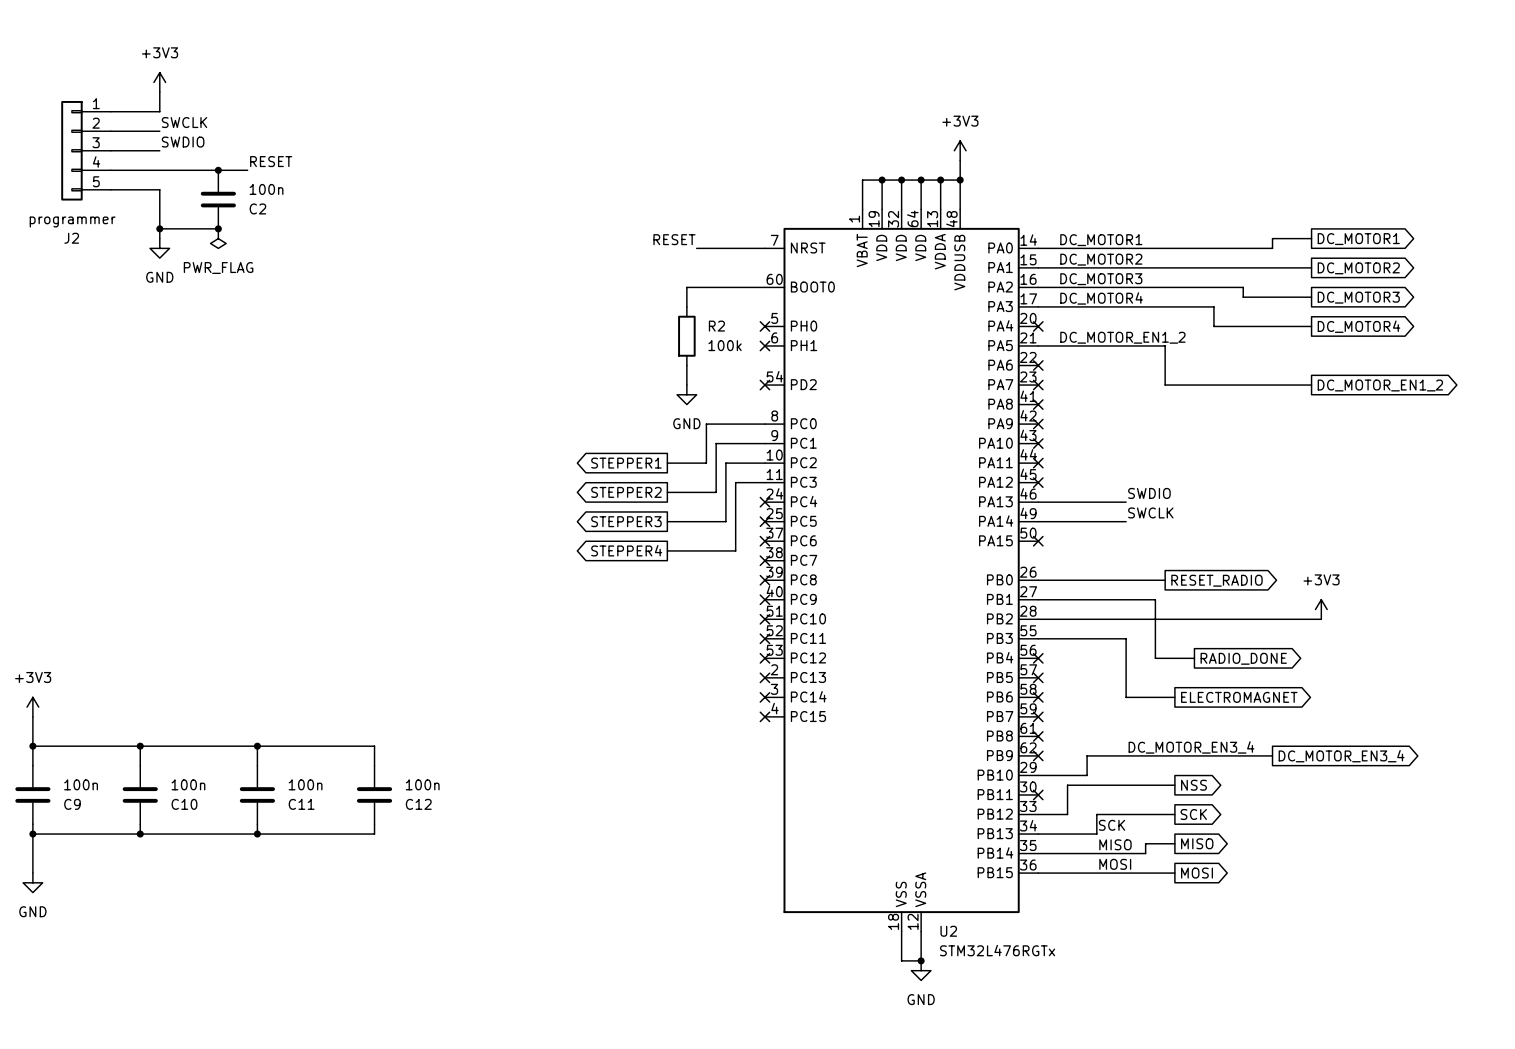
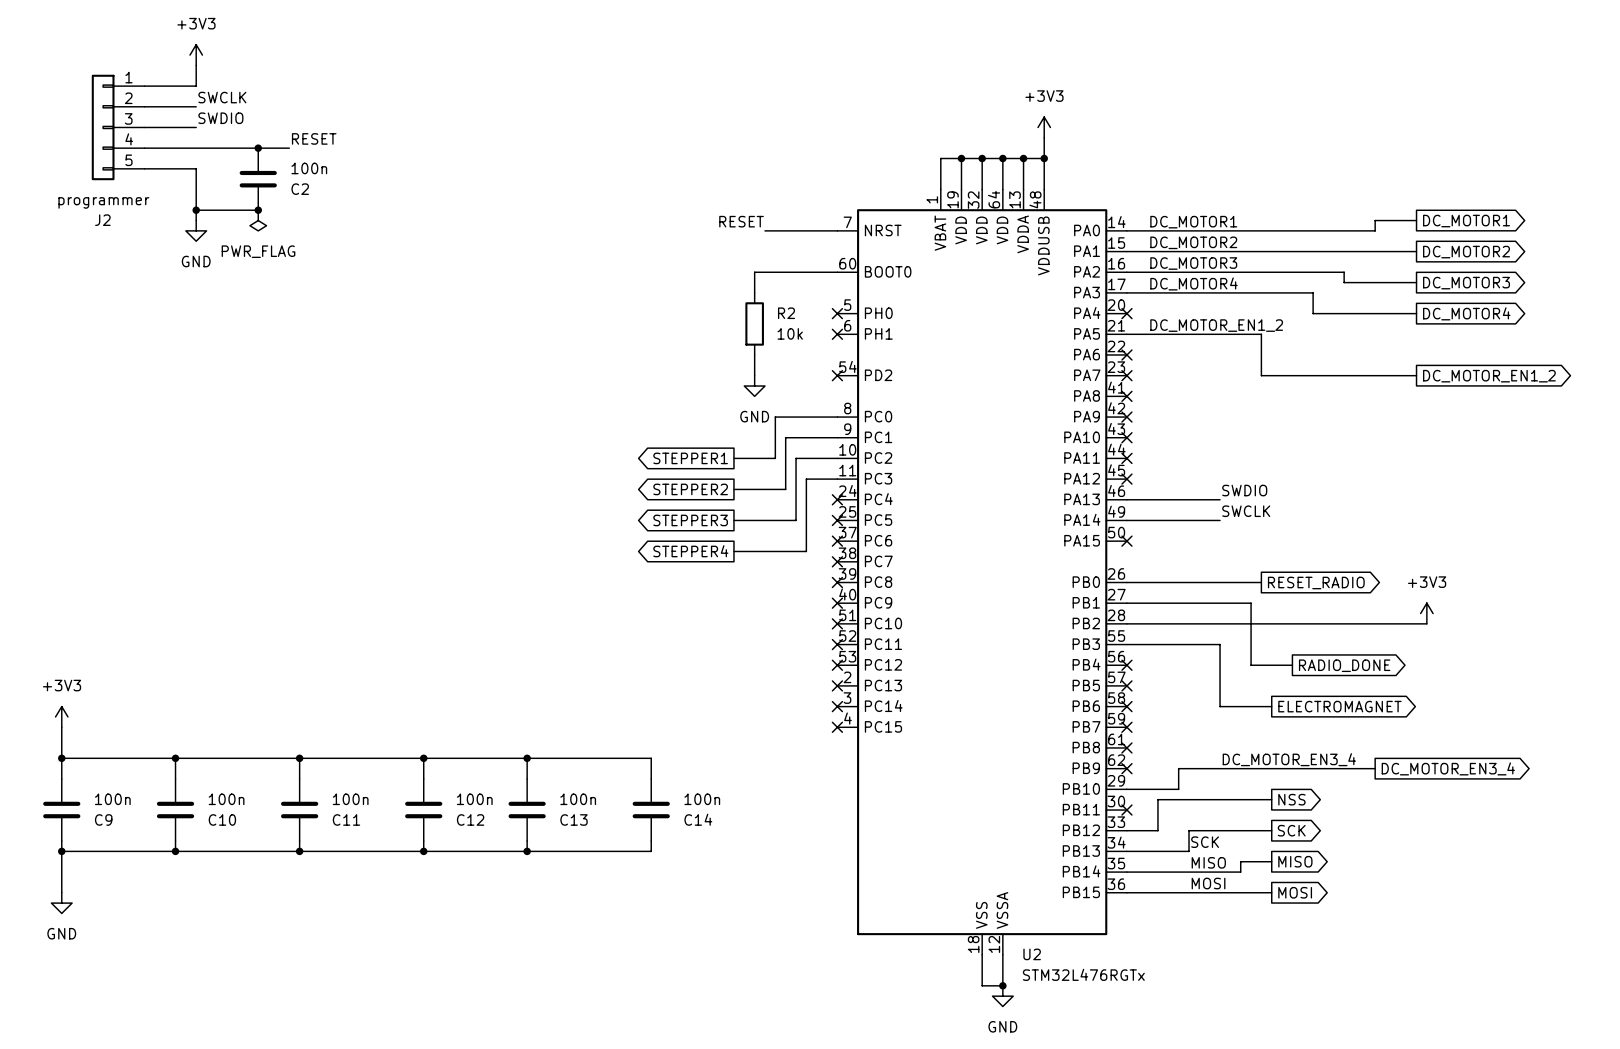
R2 value: 100k (725, 345) -> 10k (790, 333)
wire: none -> (423, 758) (651, 758) (651, 779)
junction: none -> (423, 758)
wire: none -> (527, 758) (527, 779)
junction: none -> (527, 758)
C13: none -> 100n (527, 810)
C14: none -> 100n (651, 810)
wire: none -> (527, 841) (527, 851)
wire: none -> (651, 841) (651, 851) (423, 851)
junction: none -> (423, 851)
junction: none -> (527, 851)

